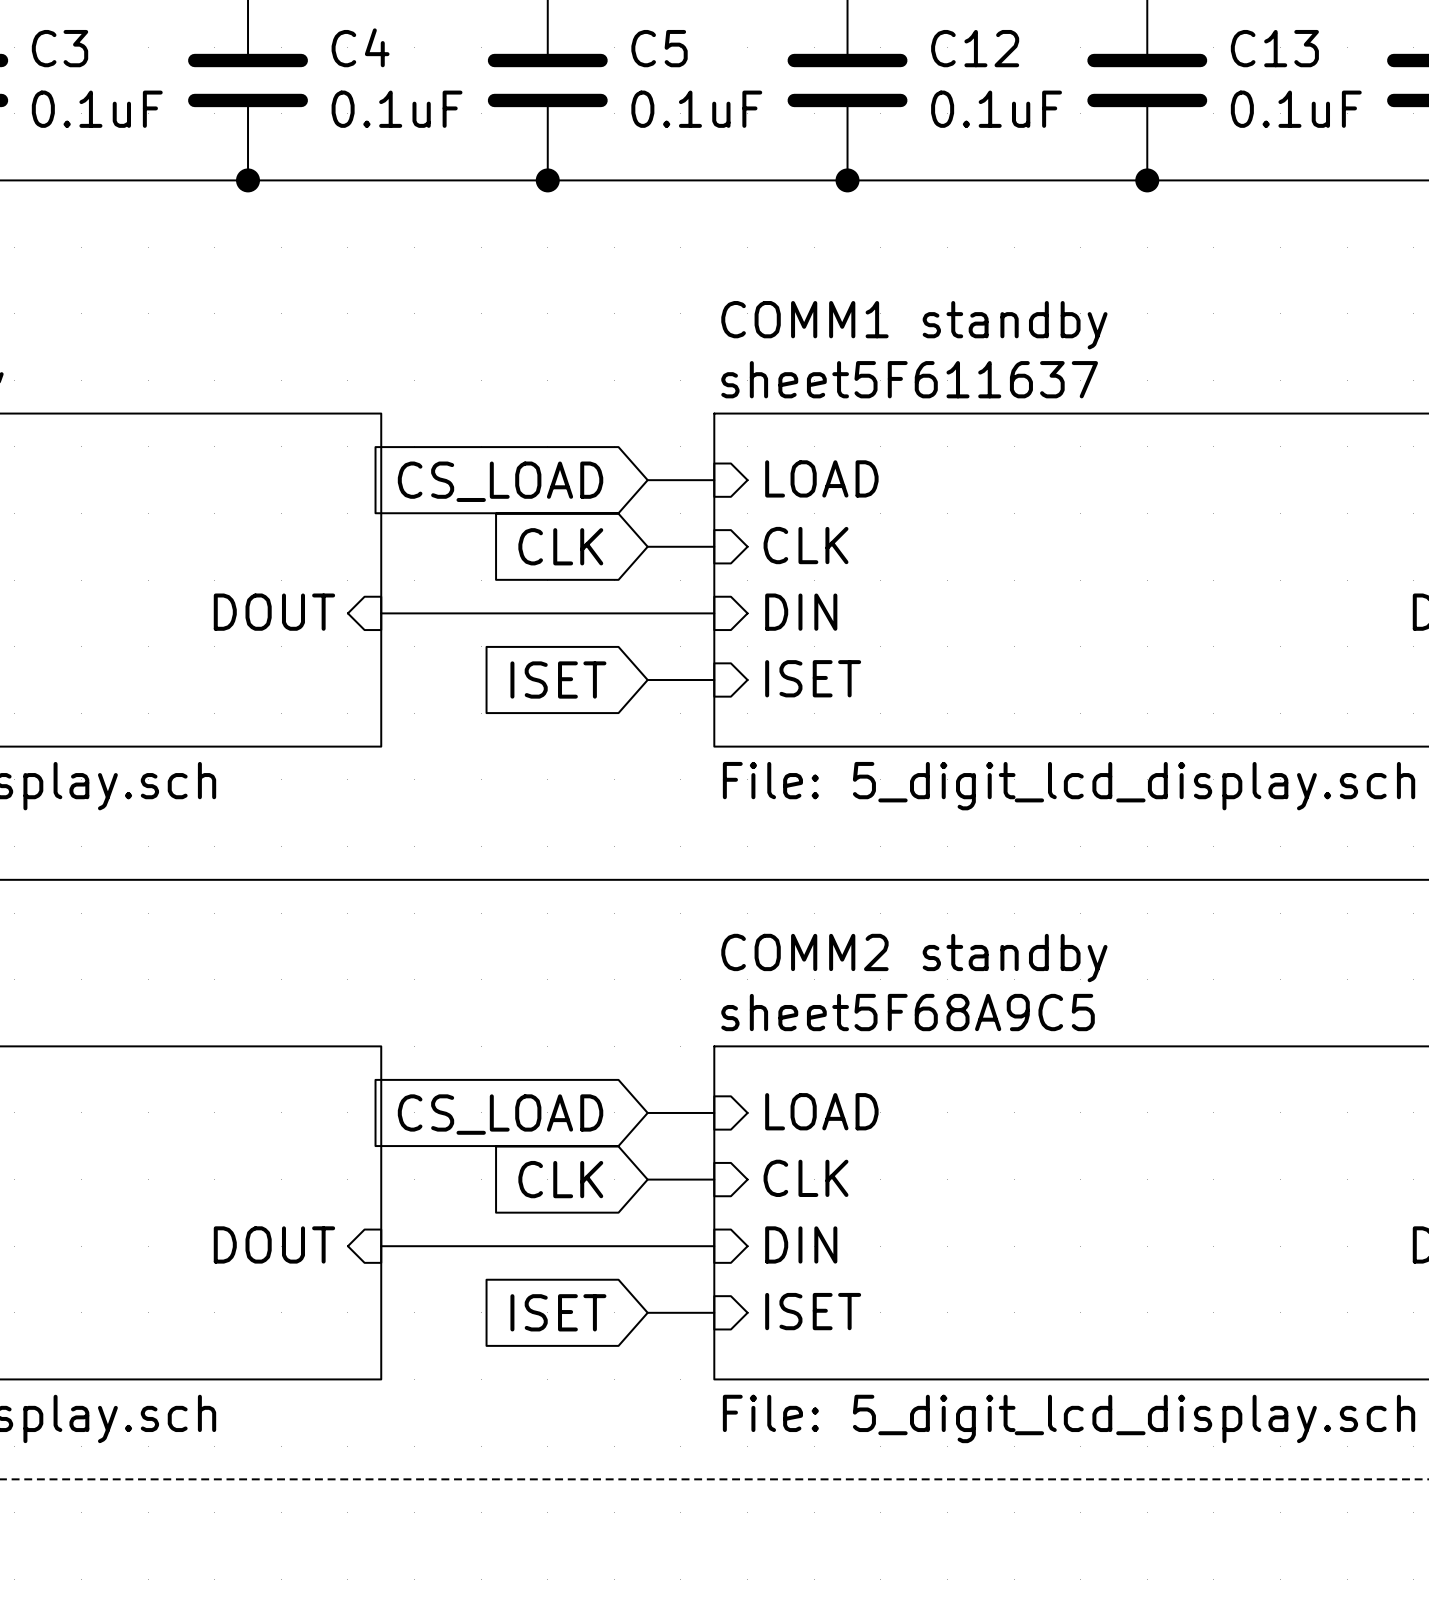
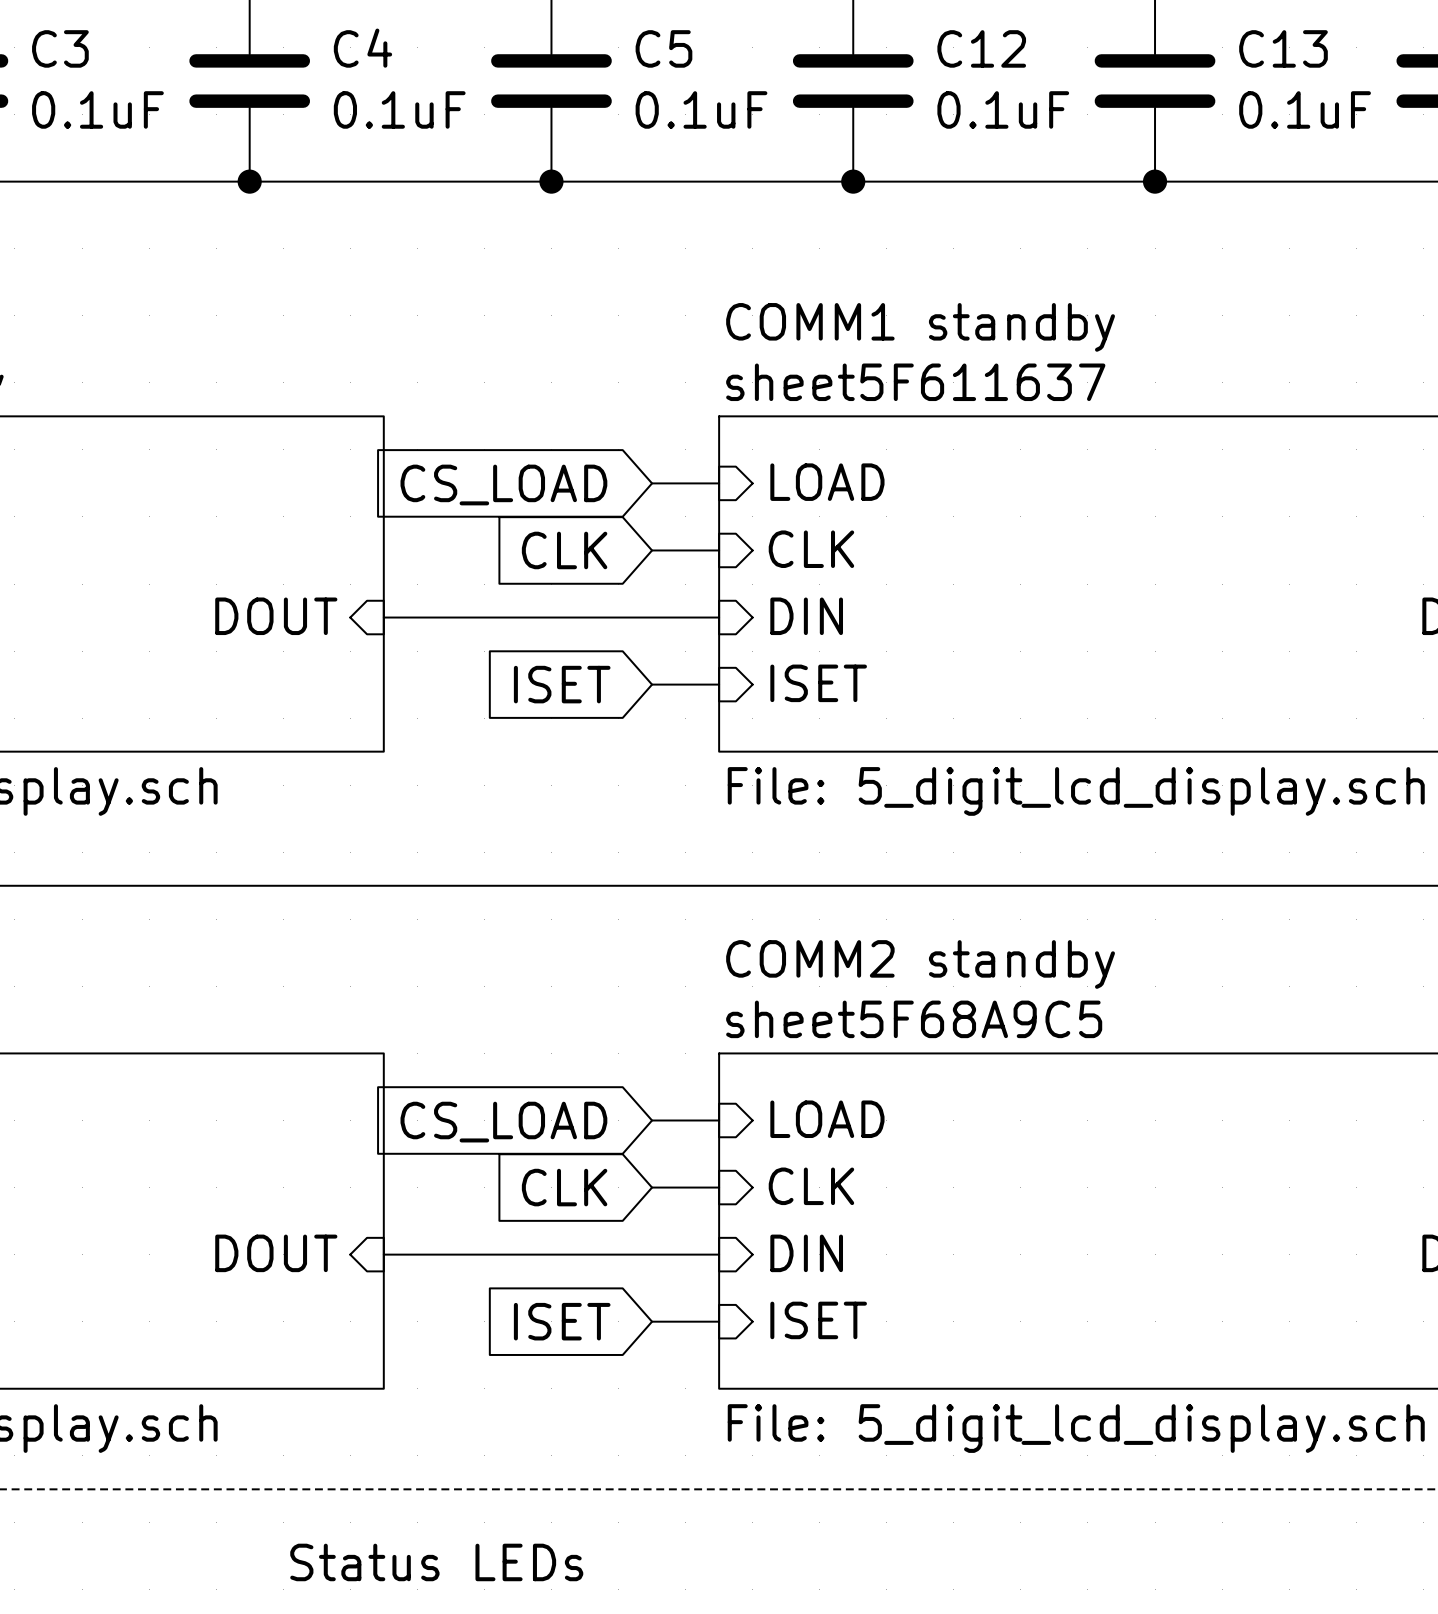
text: none -> Status LEDs (436, 1562)

